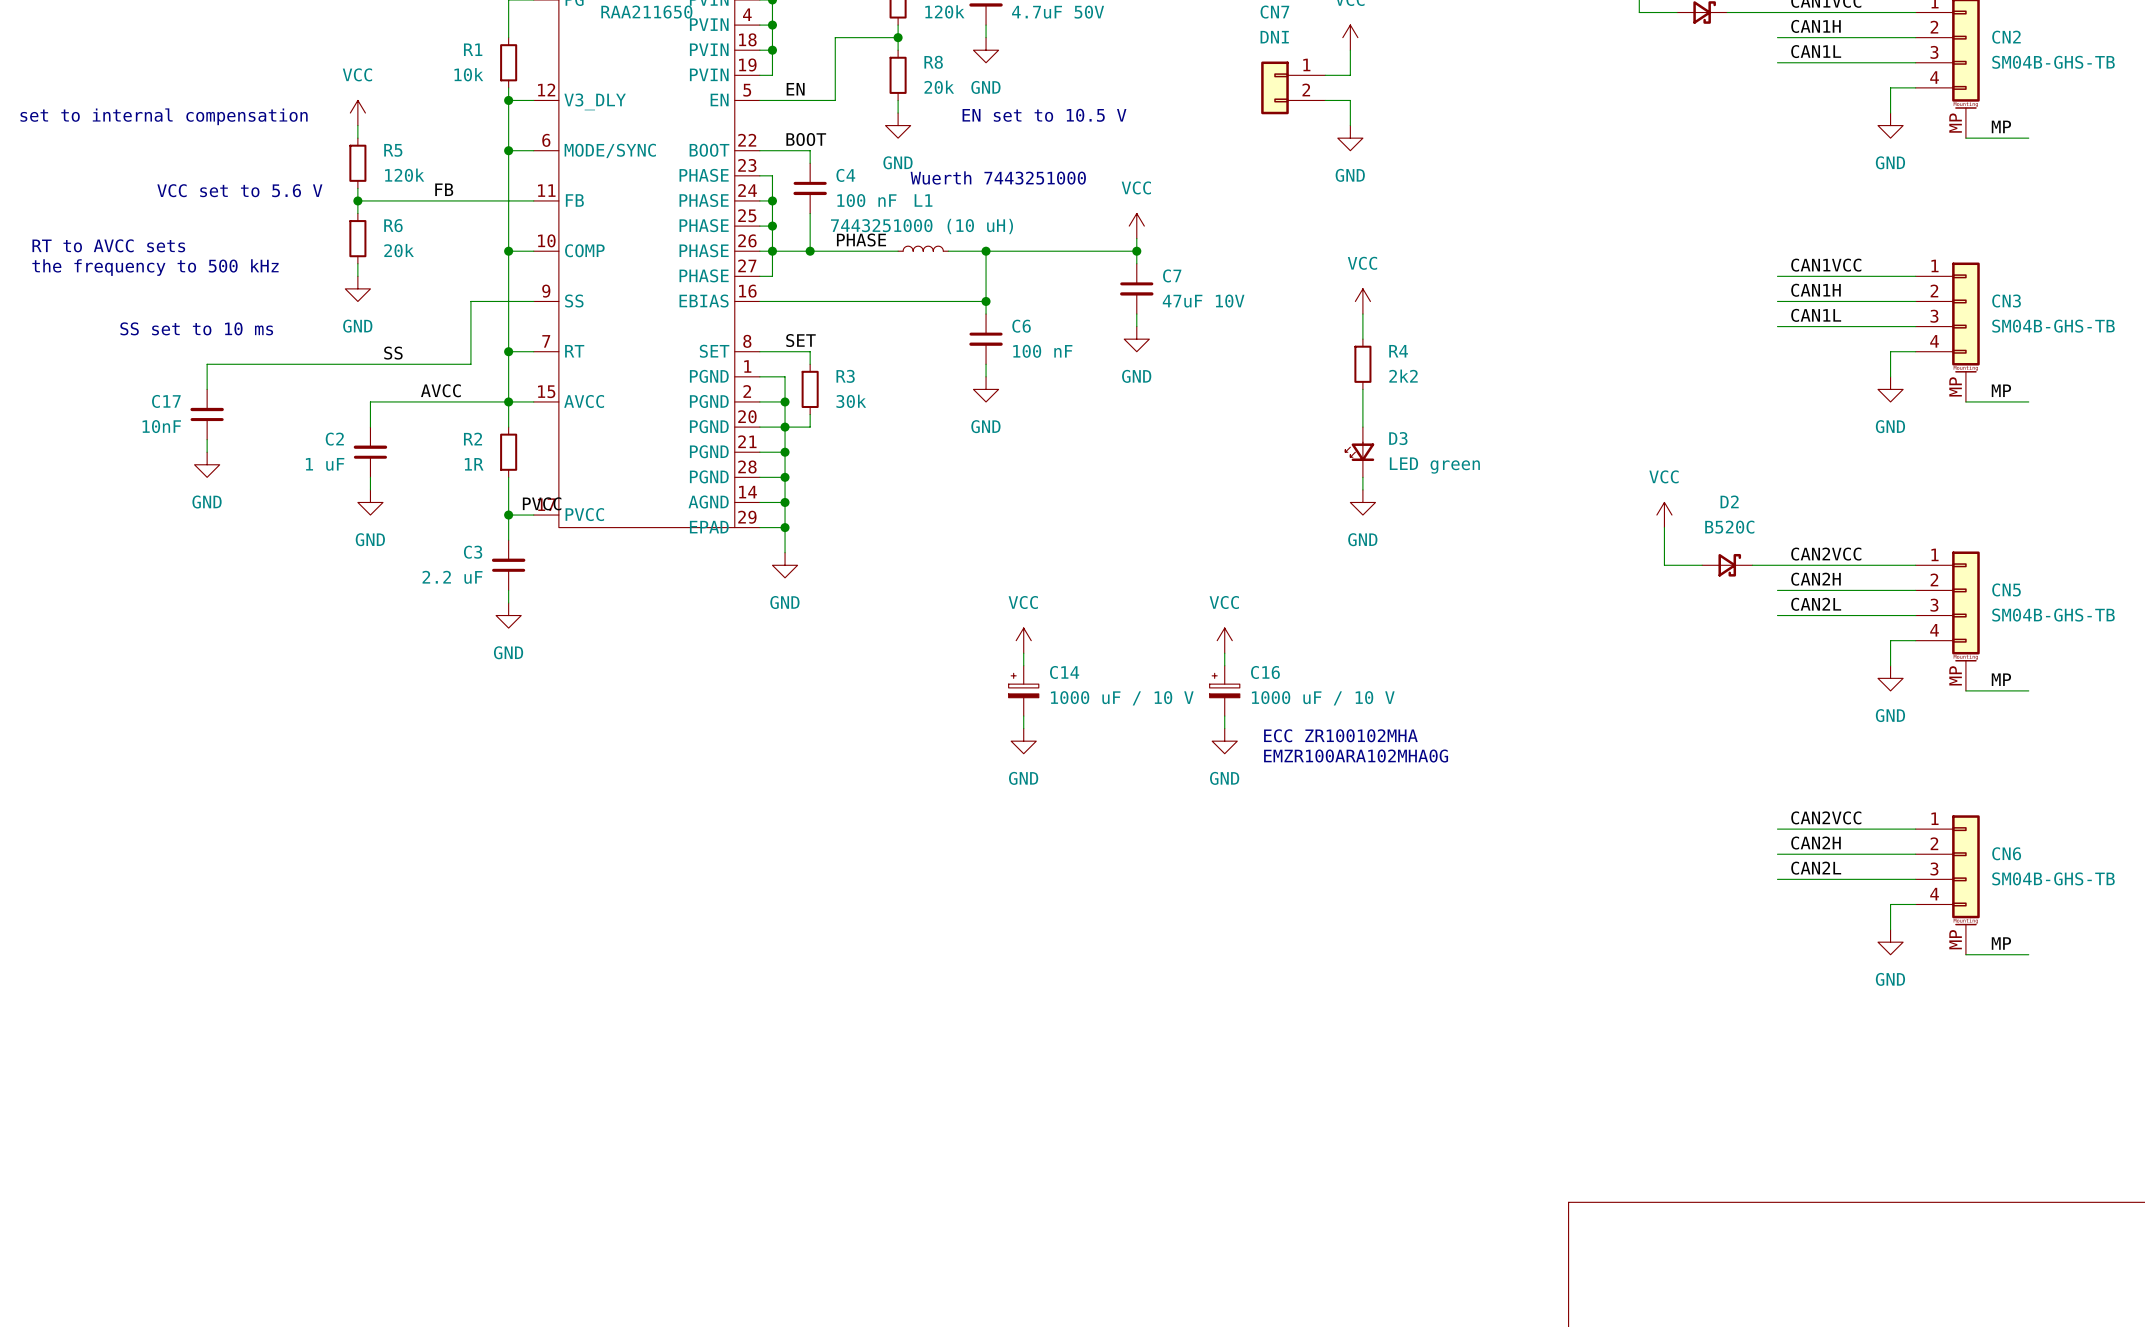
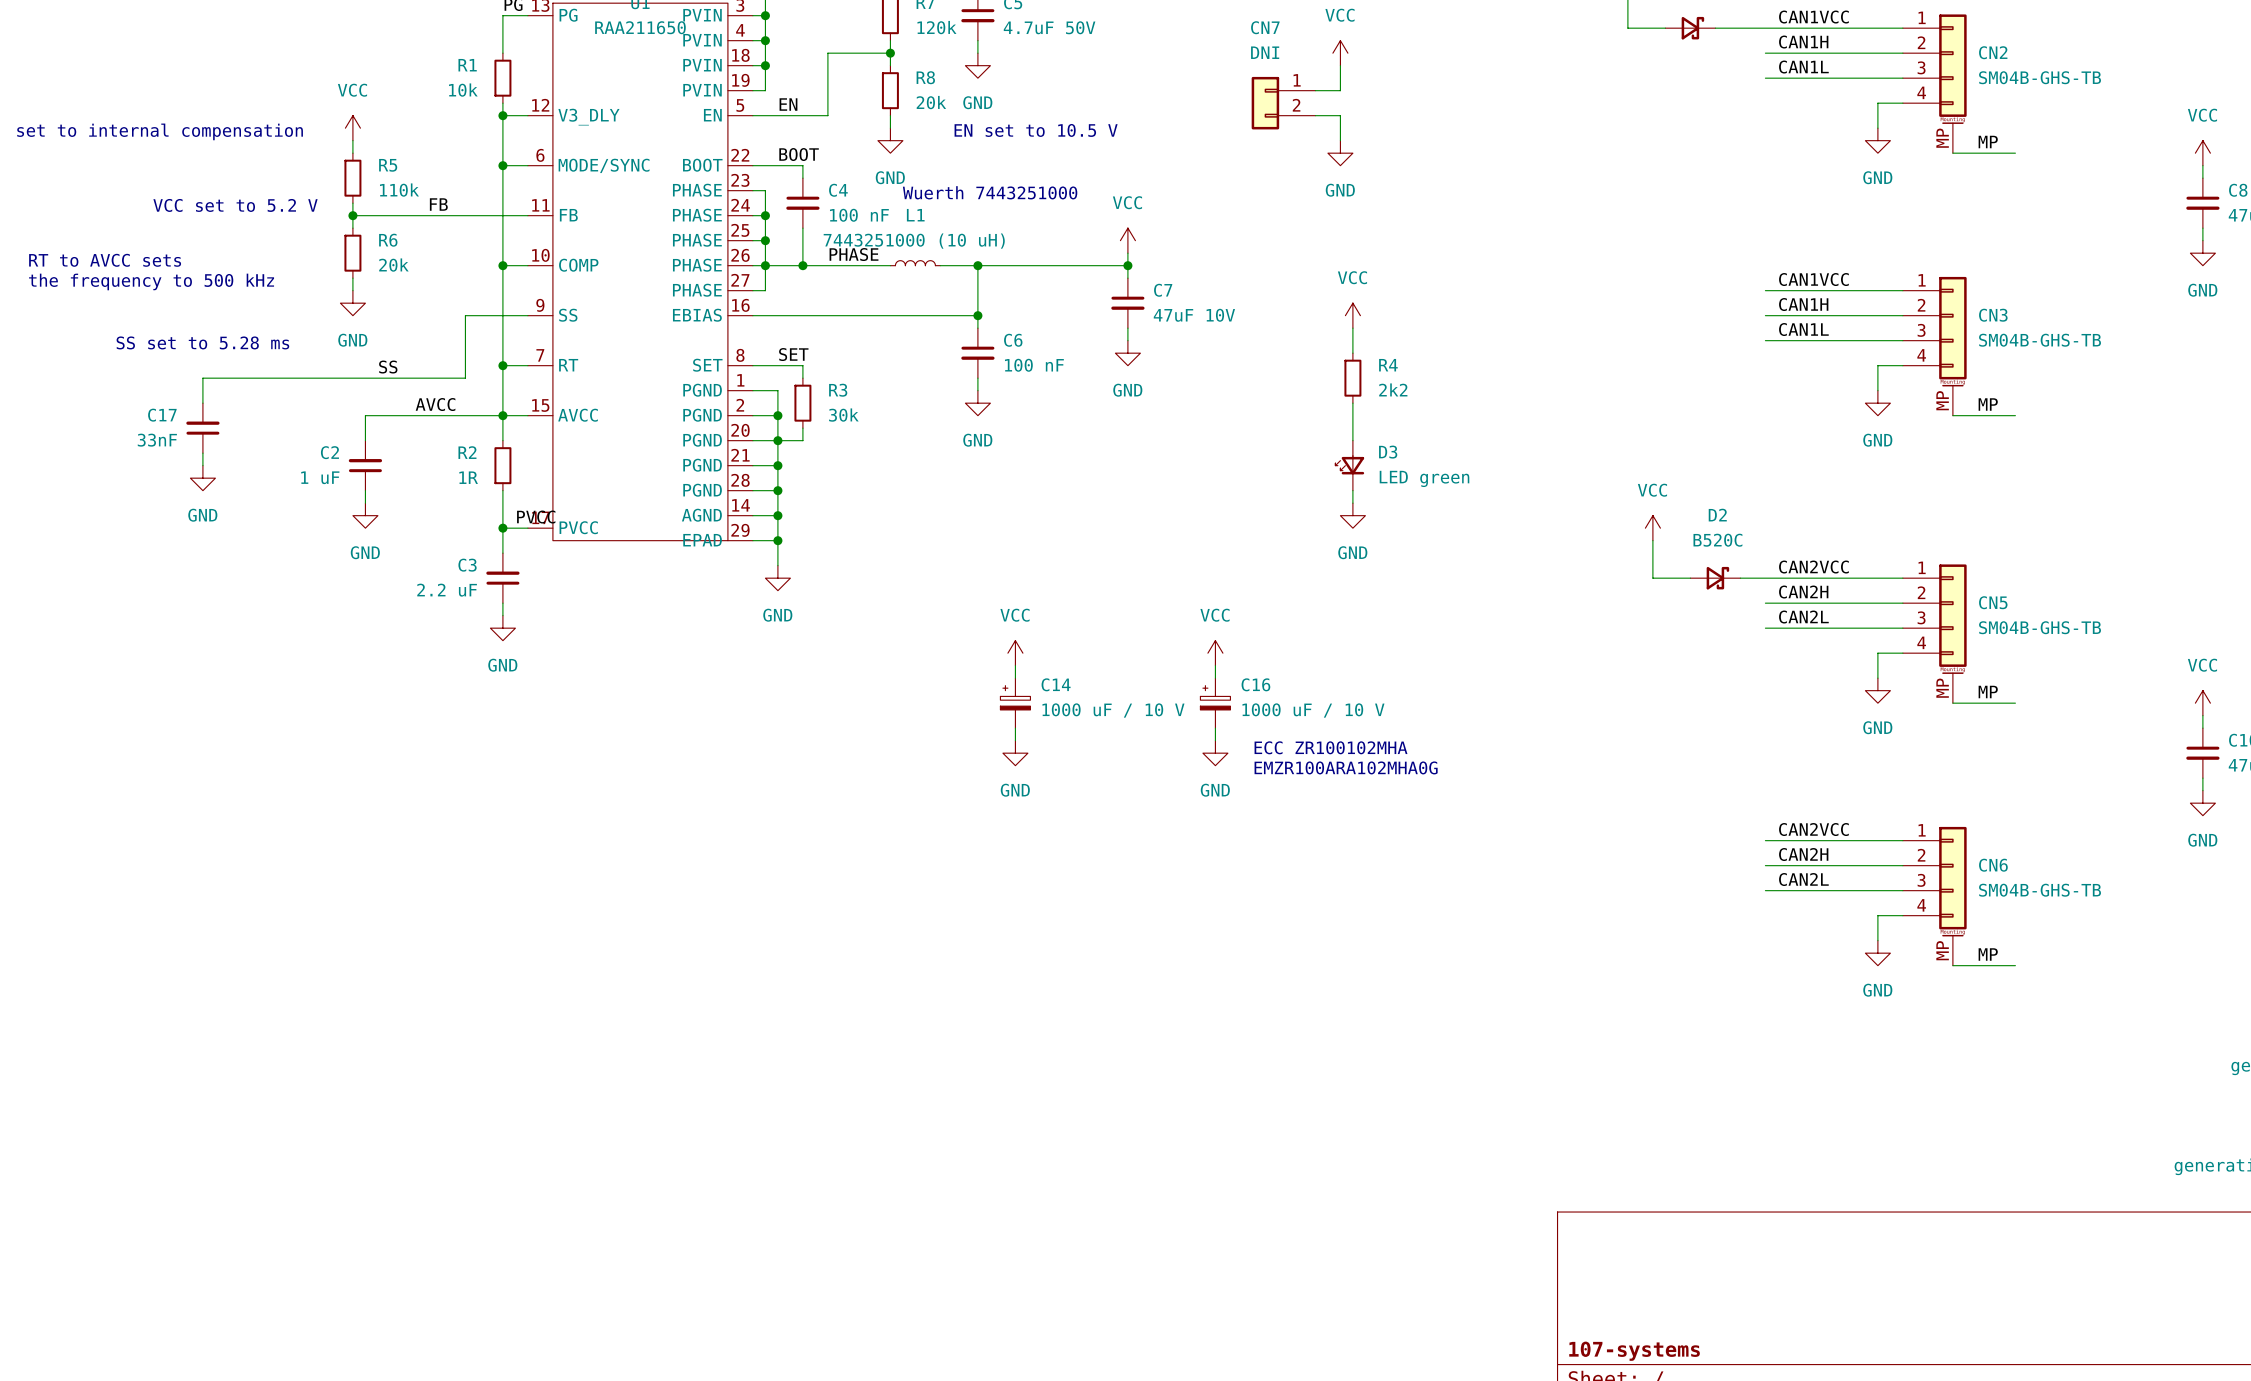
R5 value: 120k (404, 175) -> 110k (399, 190)
text: VCC set to 5.6 V (239, 190) -> VCC set to 5.2 V (235, 205)
text: SS set to 10 ms (196, 328) -> SS set to 5.28 ms (202, 342)
C17 value: 10nF (161, 426) -> 33nF (157, 440)

